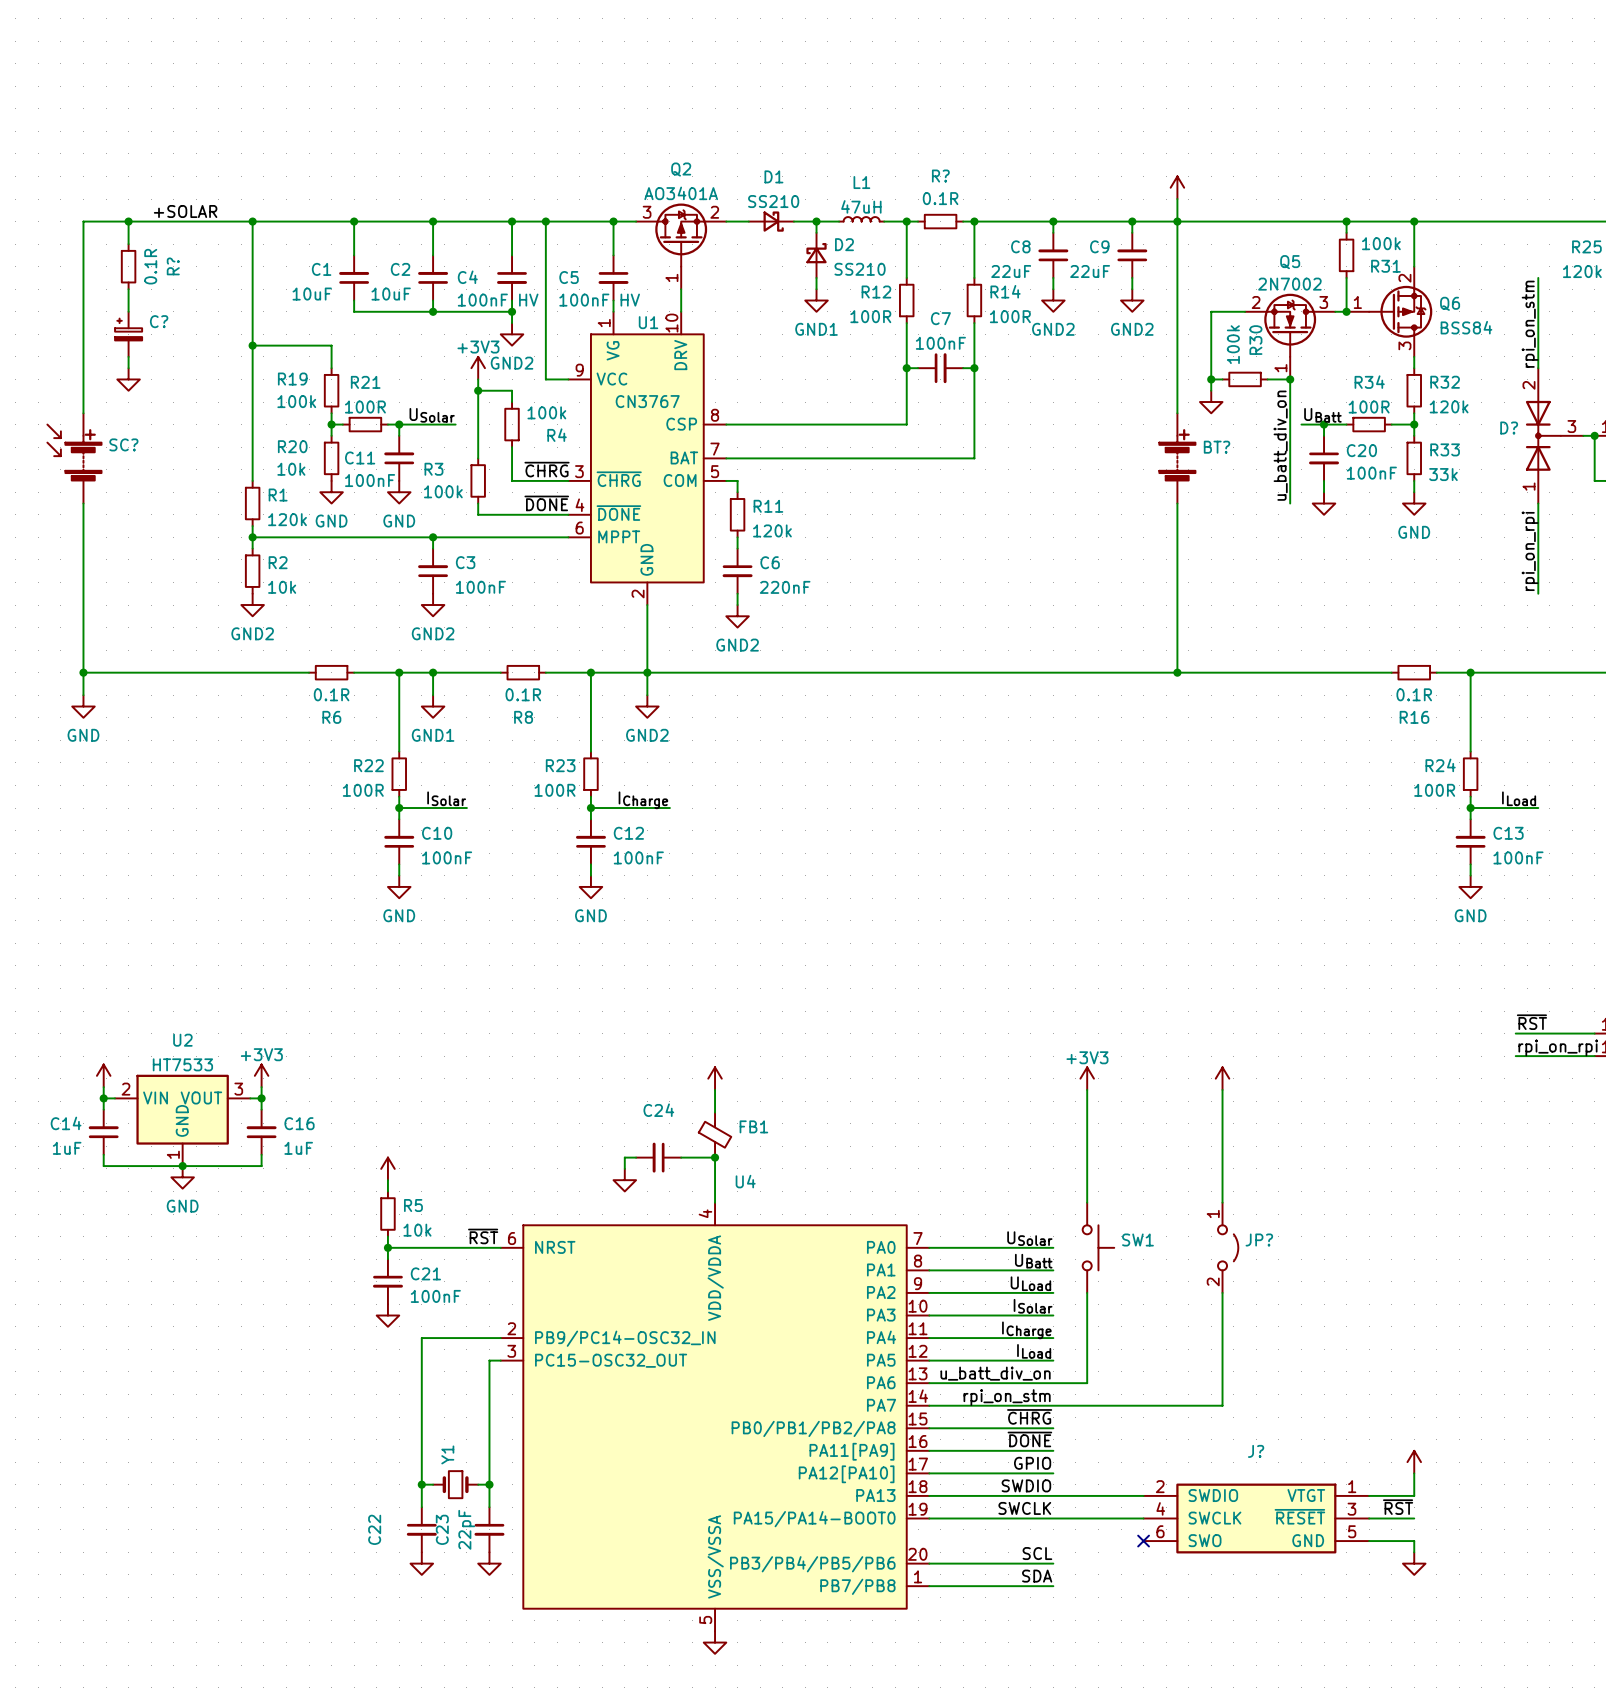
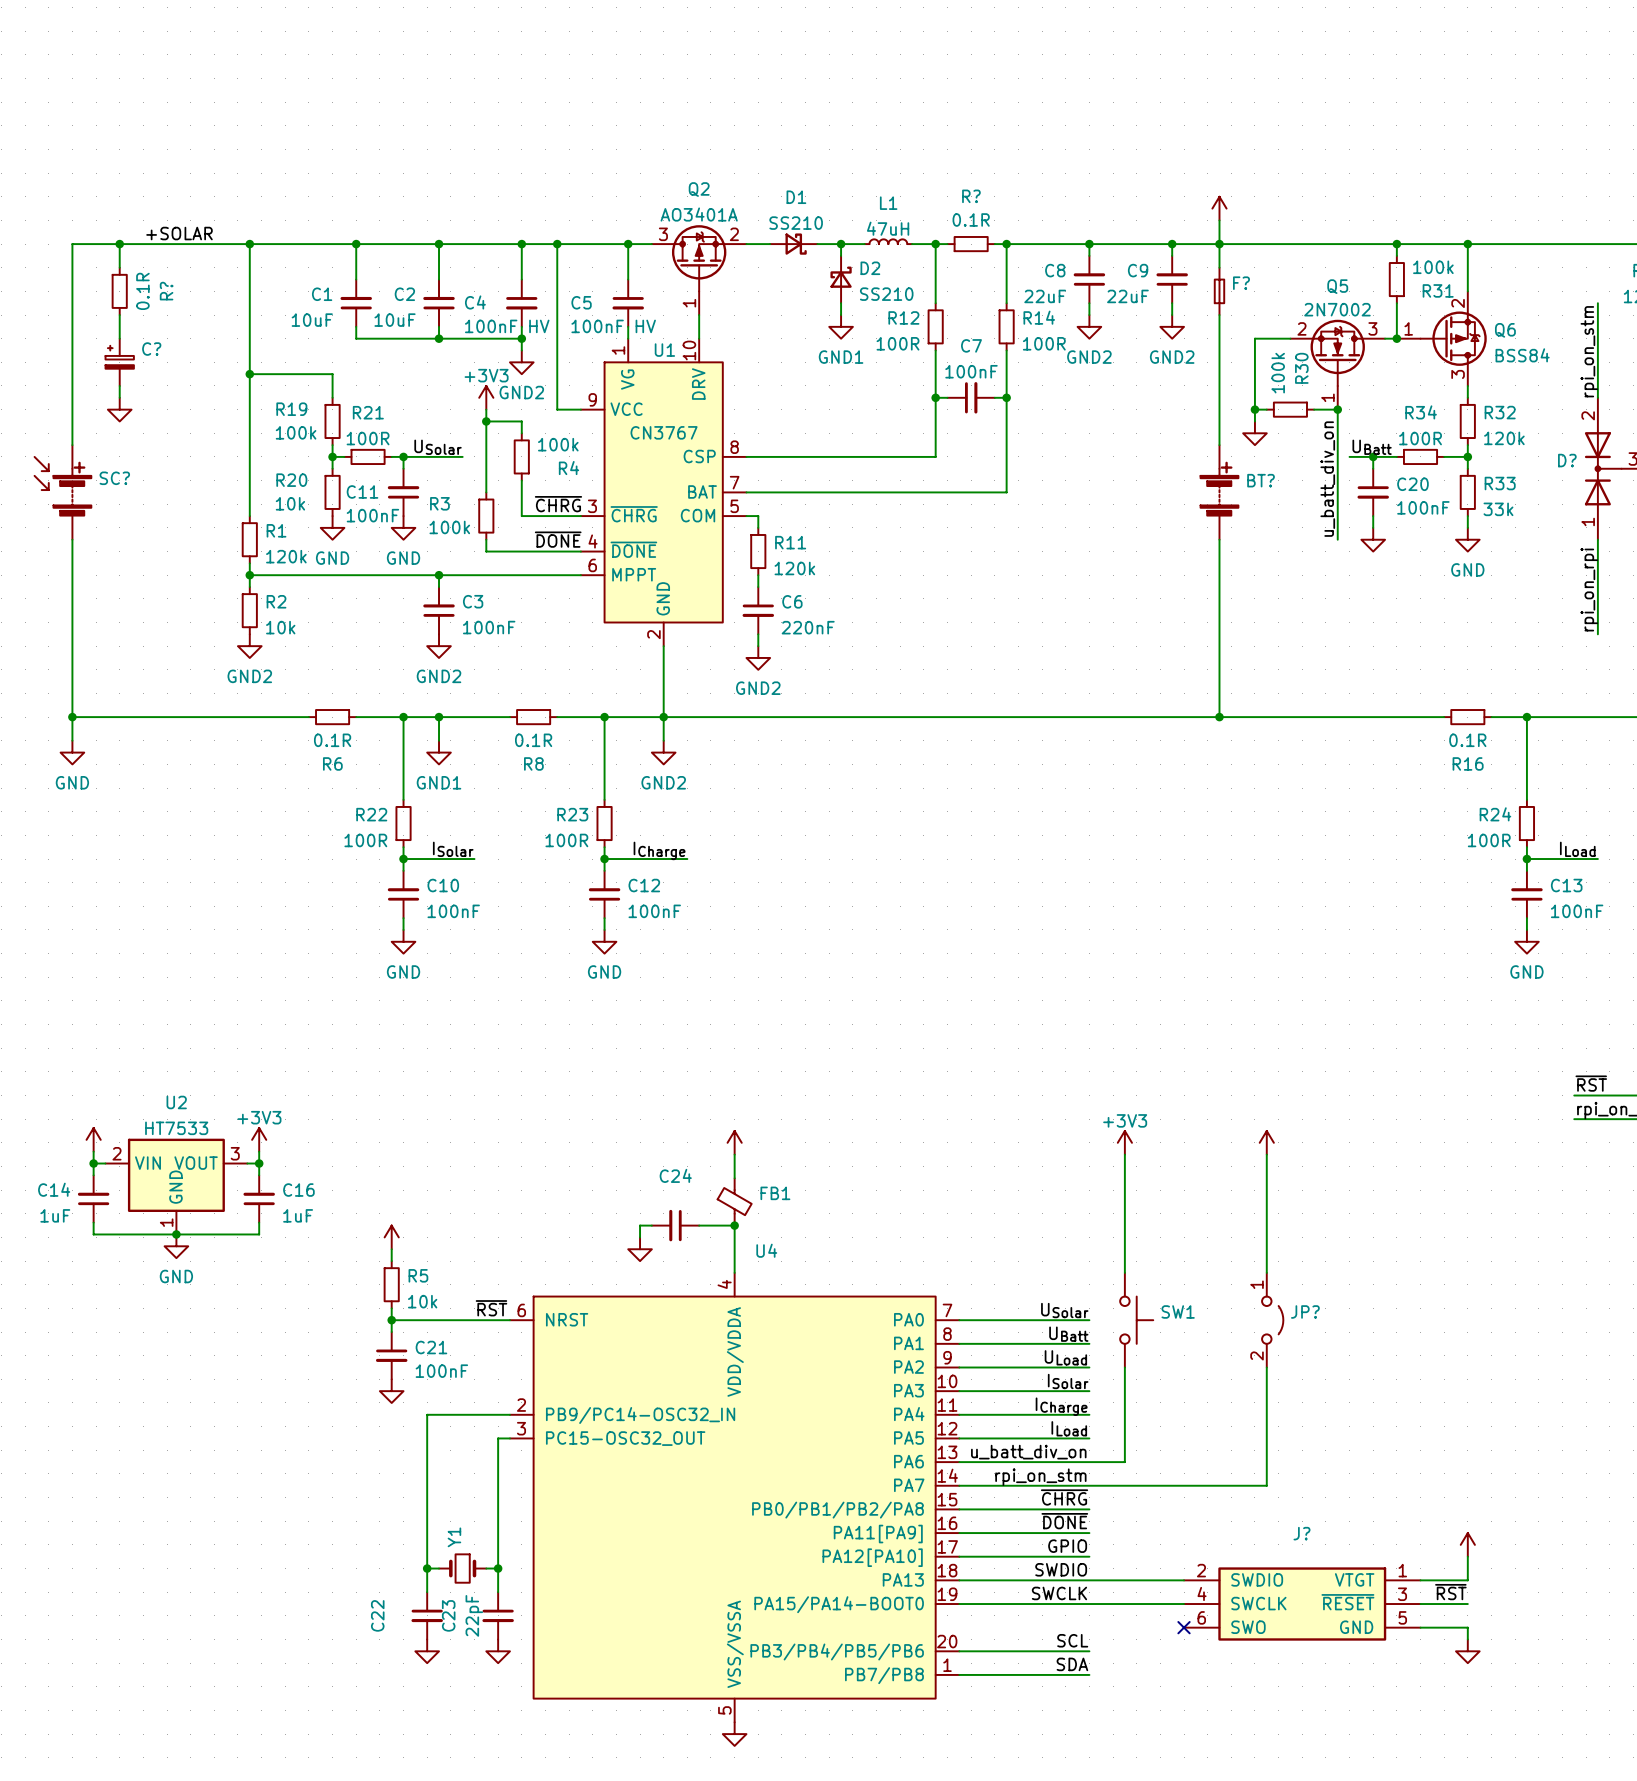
F?: none -> (1219, 291)

